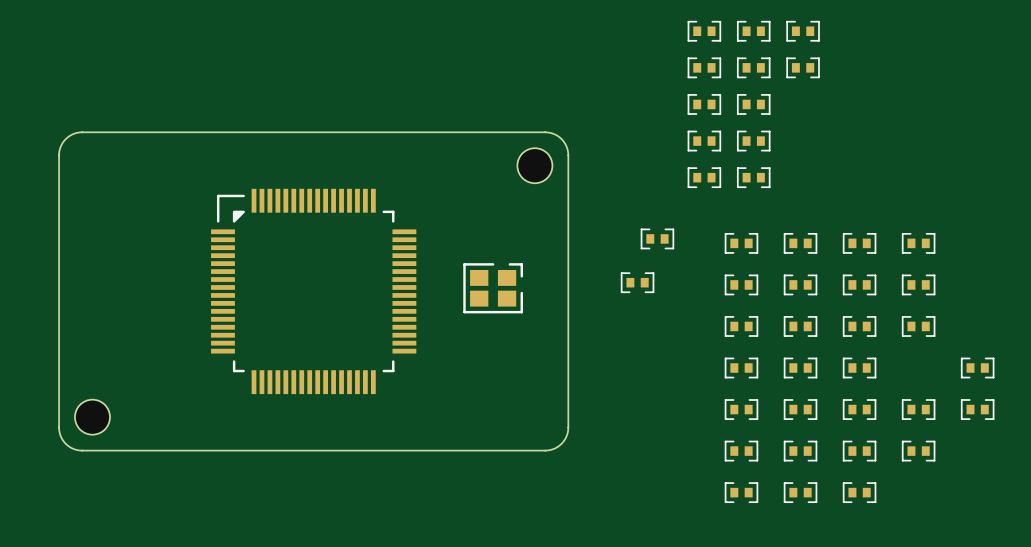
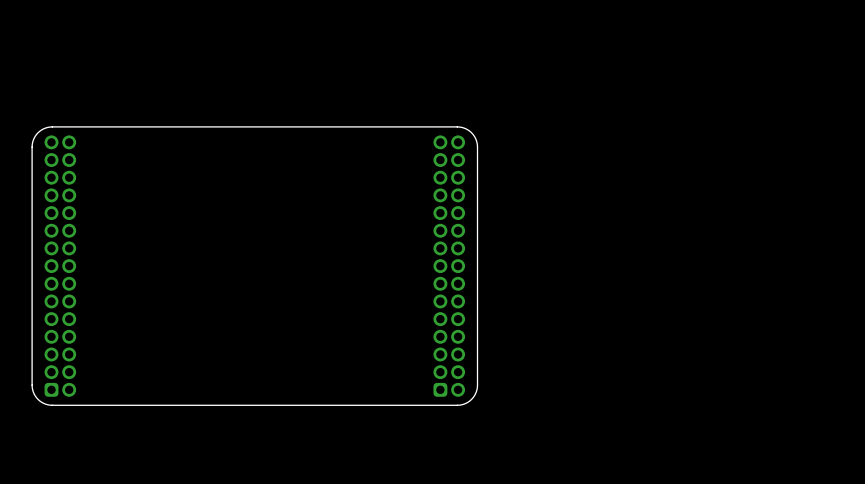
part: (704, 31) -> none
part: (753, 31) -> none
part: (803, 31) -> none
part: (704, 67) -> none
part: (753, 67) -> none
part: (803, 67) -> none
part: (704, 104) -> none
part: (753, 104) -> none
part: (704, 141) -> none
part: (753, 141) -> none
part: (534, 165) -> none
part: (704, 177) -> none
part: (753, 177) -> none
part: (657, 238) -> none
part: (741, 243) -> none
part: (800, 243) -> none
part: (859, 243) -> none
part: (918, 243) -> none
part: (637, 282) -> none
part: (741, 284) -> none
part: (800, 284) -> none
part: (859, 284) -> none
part: (918, 284) -> none
part: (493, 288) -> none
part: none -> (60, 266)
part: (313, 291) -> none
part: none -> (449, 266)
part: (741, 326) -> none
part: (800, 326) -> none
part: (859, 326) -> none
part: (918, 326) -> none
part: (741, 368) -> none
part: (800, 368) -> none
part: (859, 368) -> none
part: (977, 368) -> none
part: (741, 409) -> none
part: (800, 409) -> none
part: (859, 409) -> none
part: (918, 409) -> none
part: (977, 409) -> none
part: (92, 417) -> none
part: (741, 451) -> none
part: (800, 451) -> none
part: (859, 451) -> none
part: (918, 451) -> none
part: (741, 492) -> none
part: (800, 492) -> none
part: (859, 492) -> none

